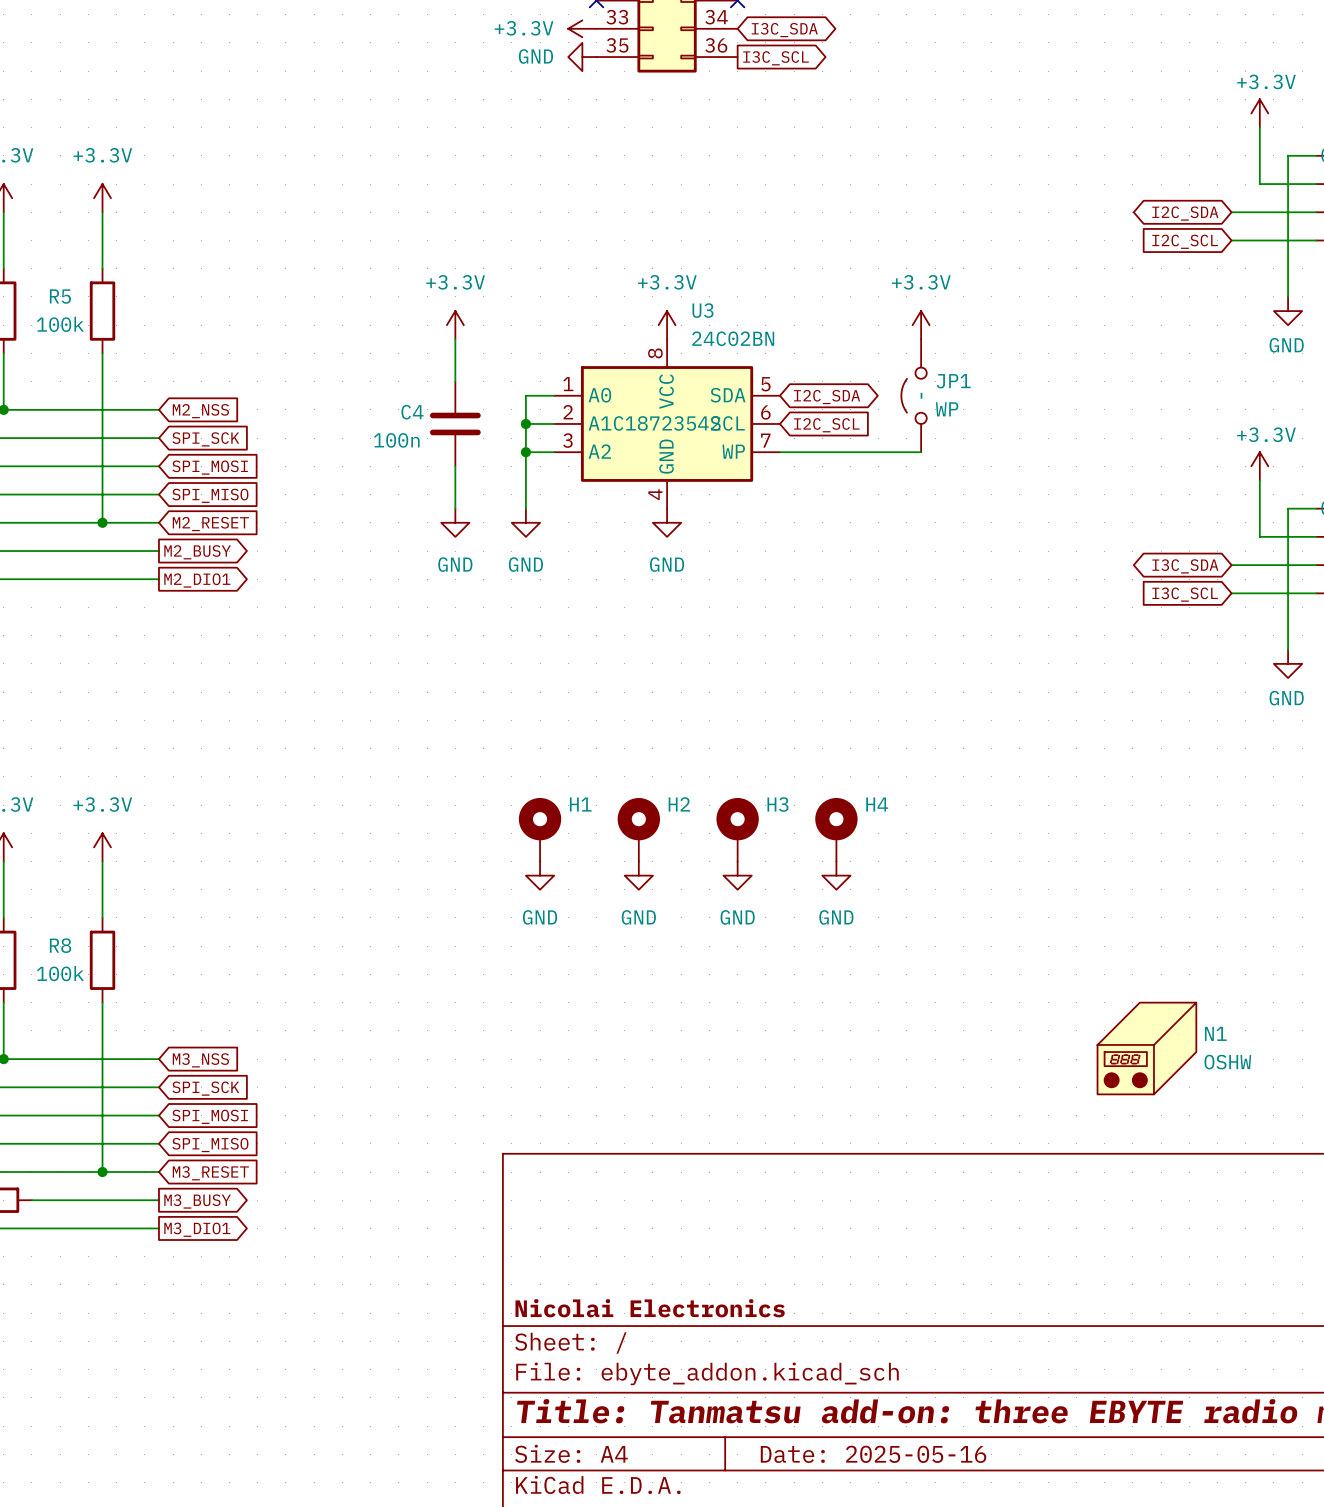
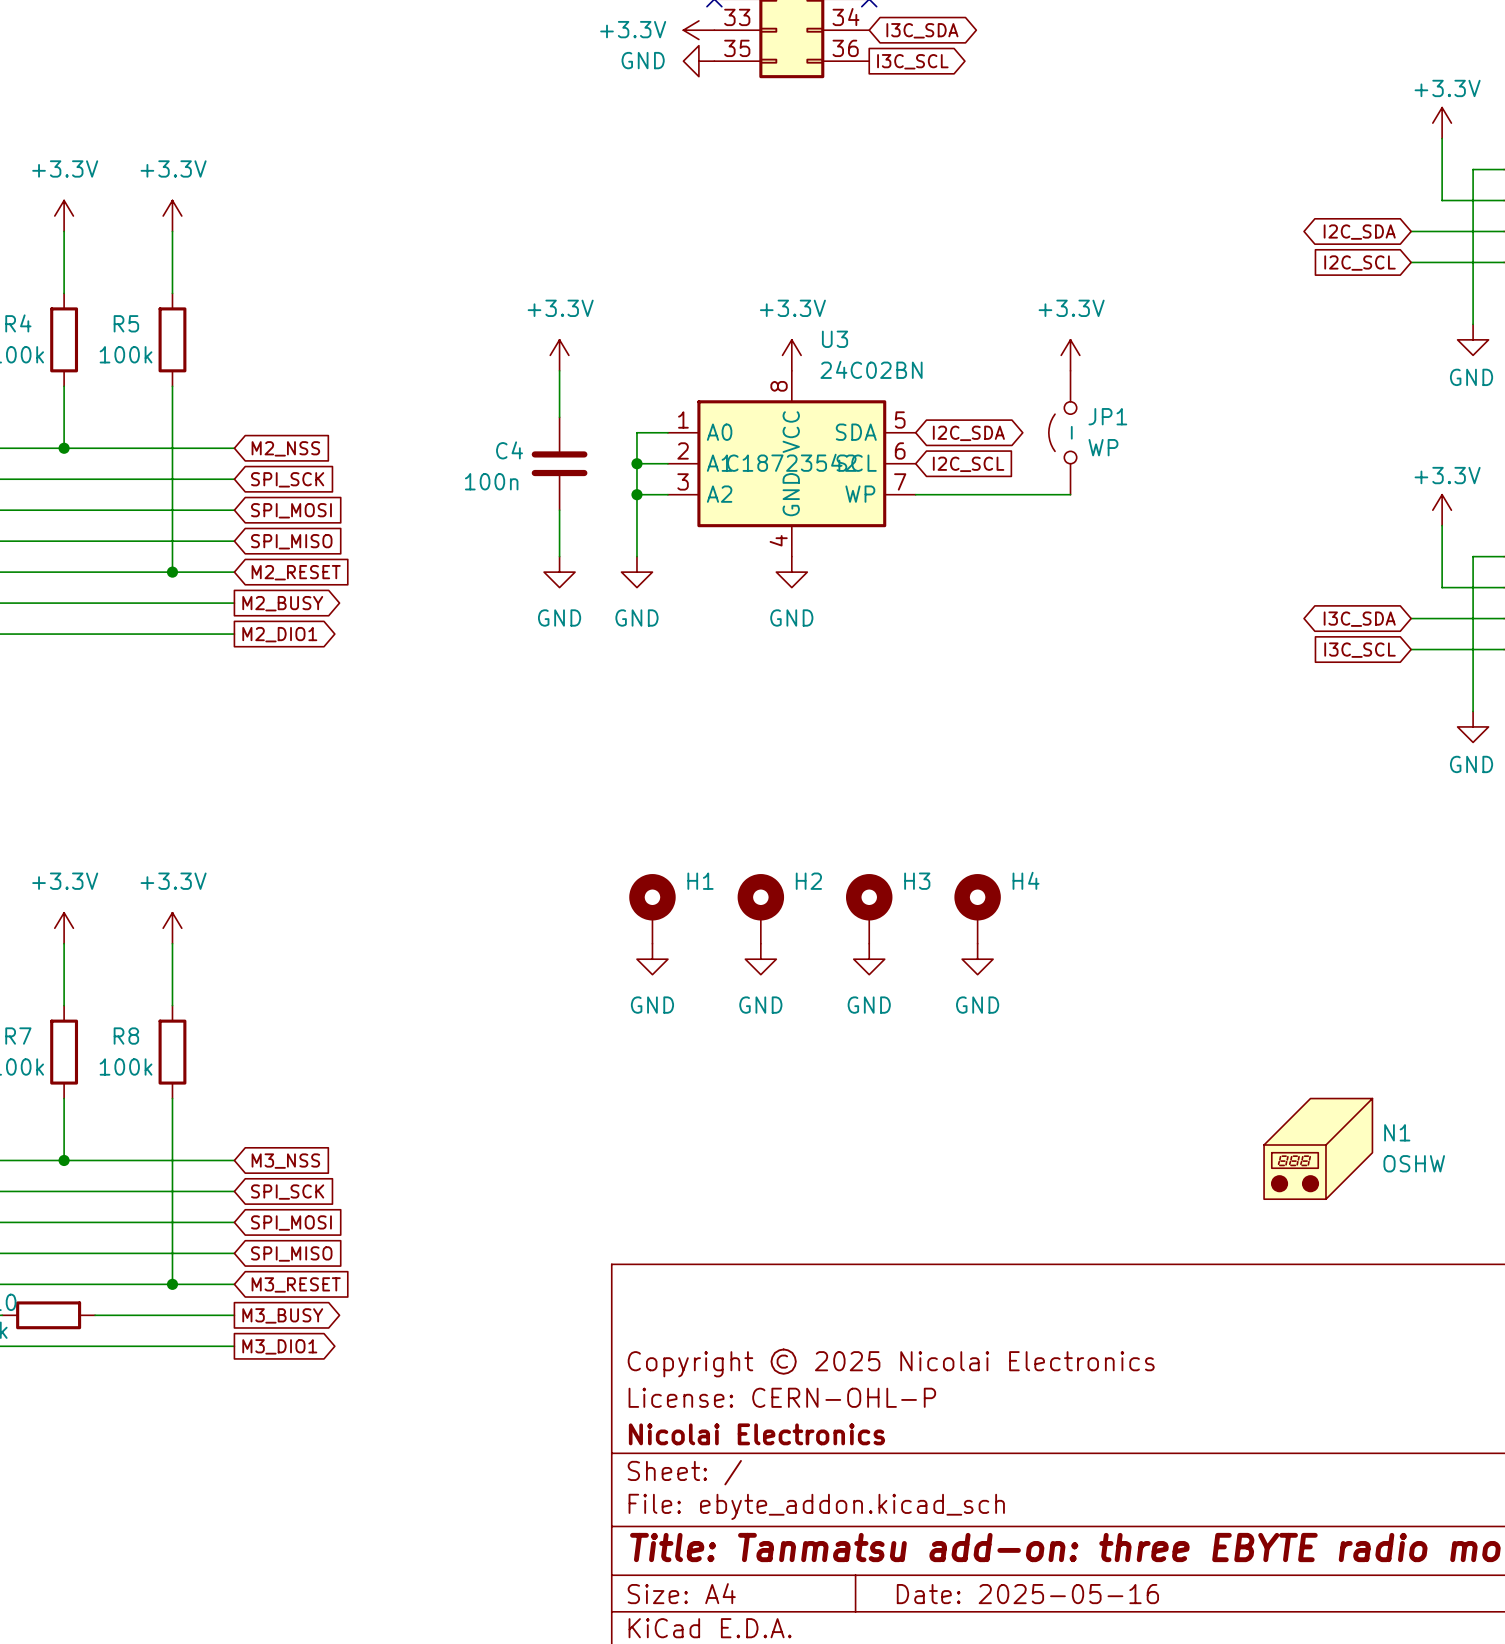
title block: none -> Copyright © 2025 Nicolai Electronics (891, 1362)
title block: none -> License: CERN-OHL-P (782, 1397)

